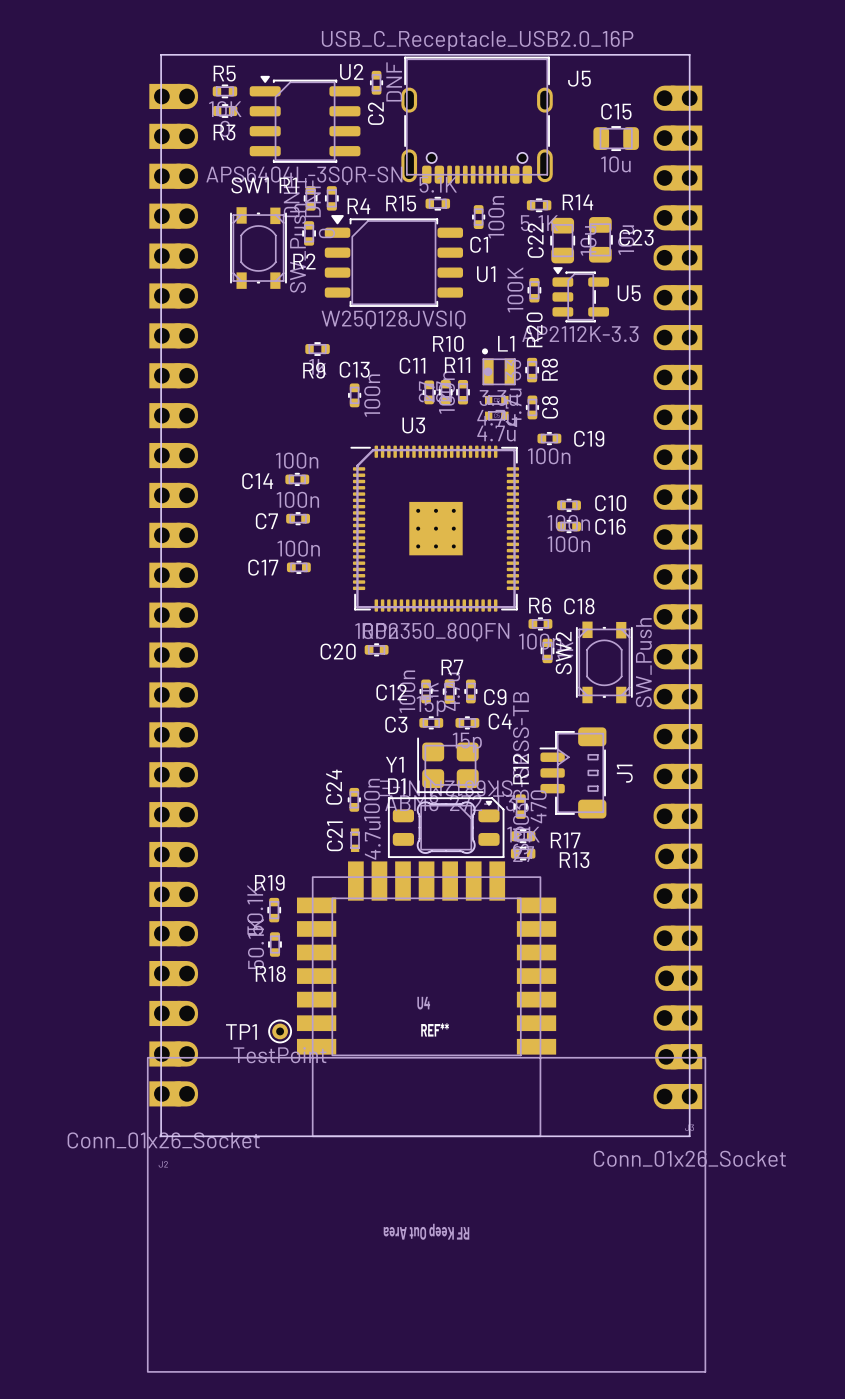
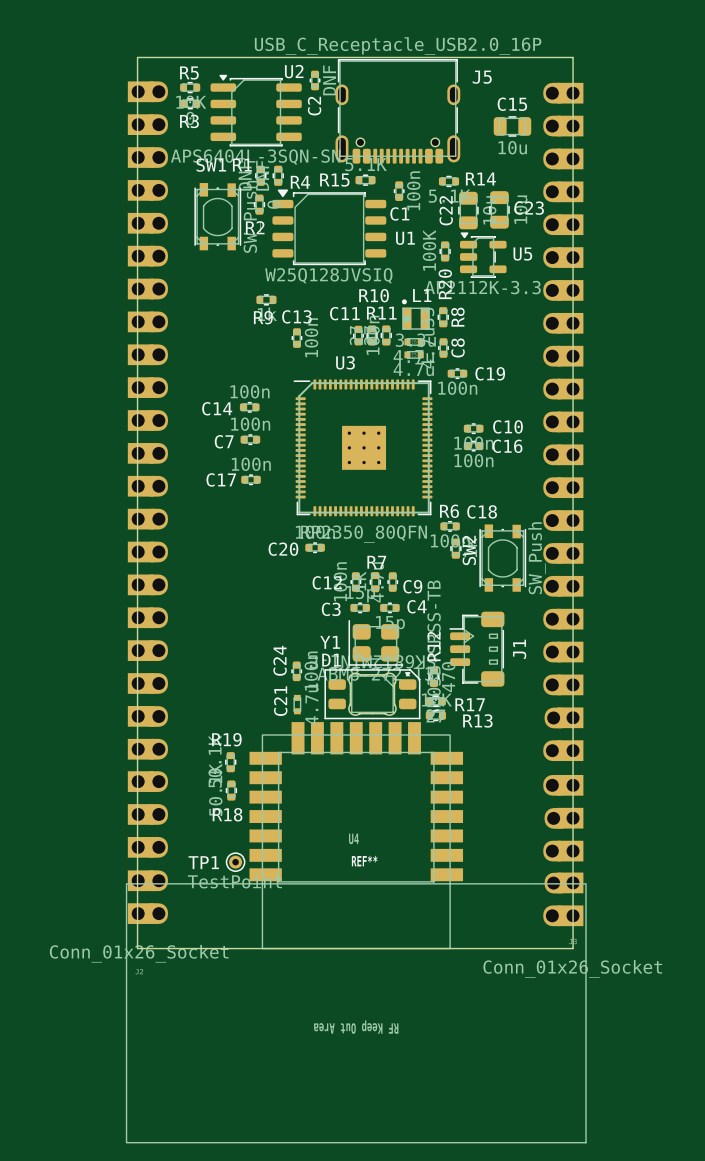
U2 value: APS6404L-3SQR-SN (304, 175) -> APS6404L-3SQN-SN (255, 157)

